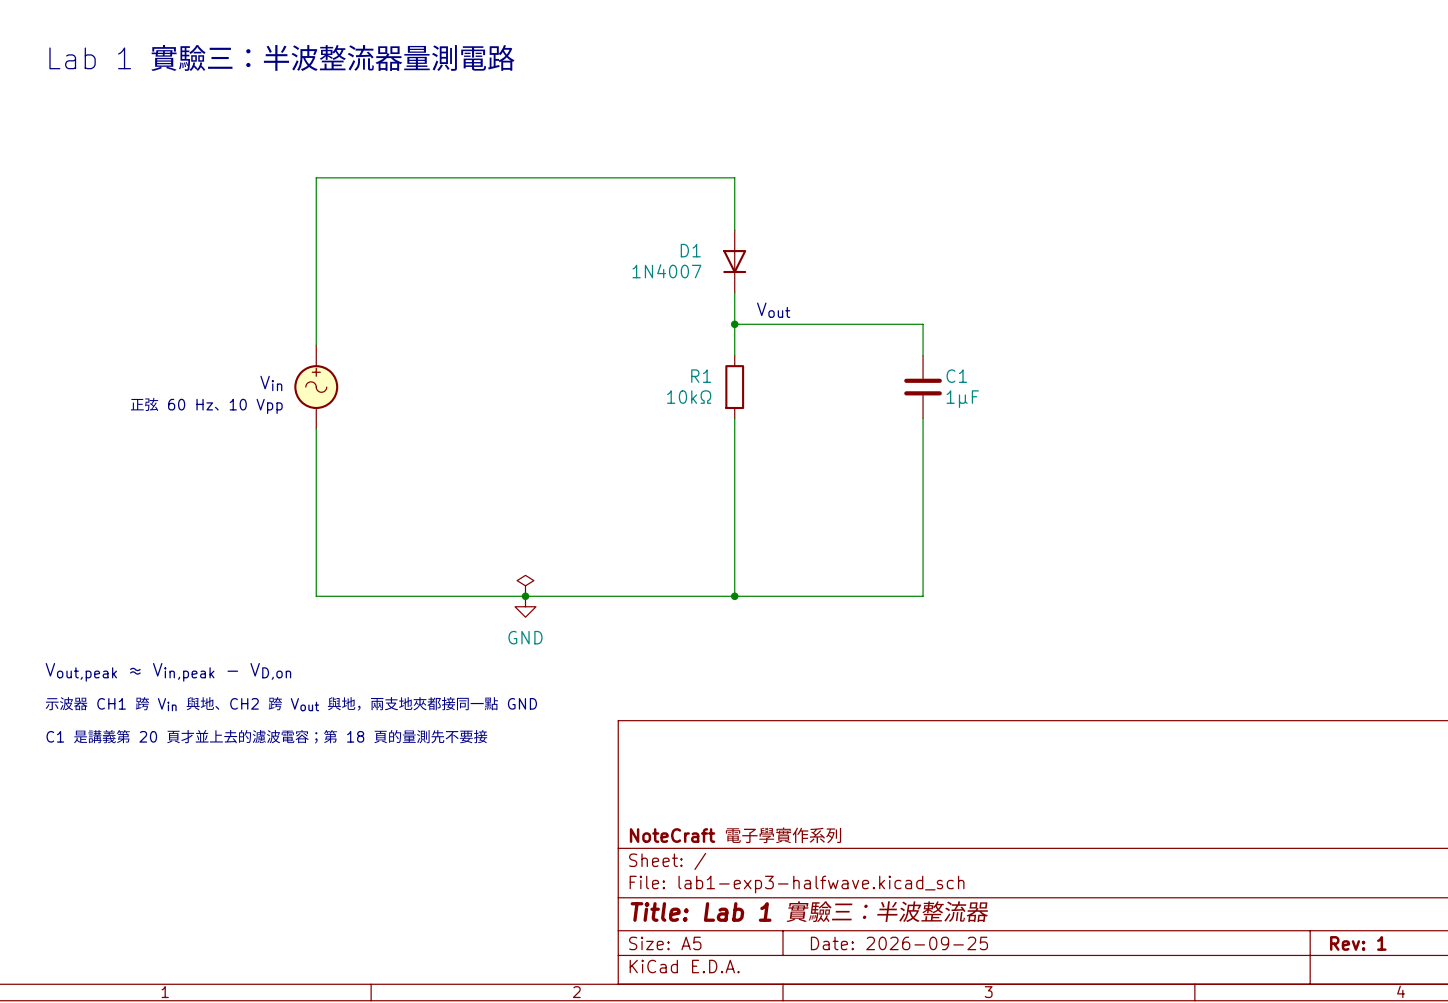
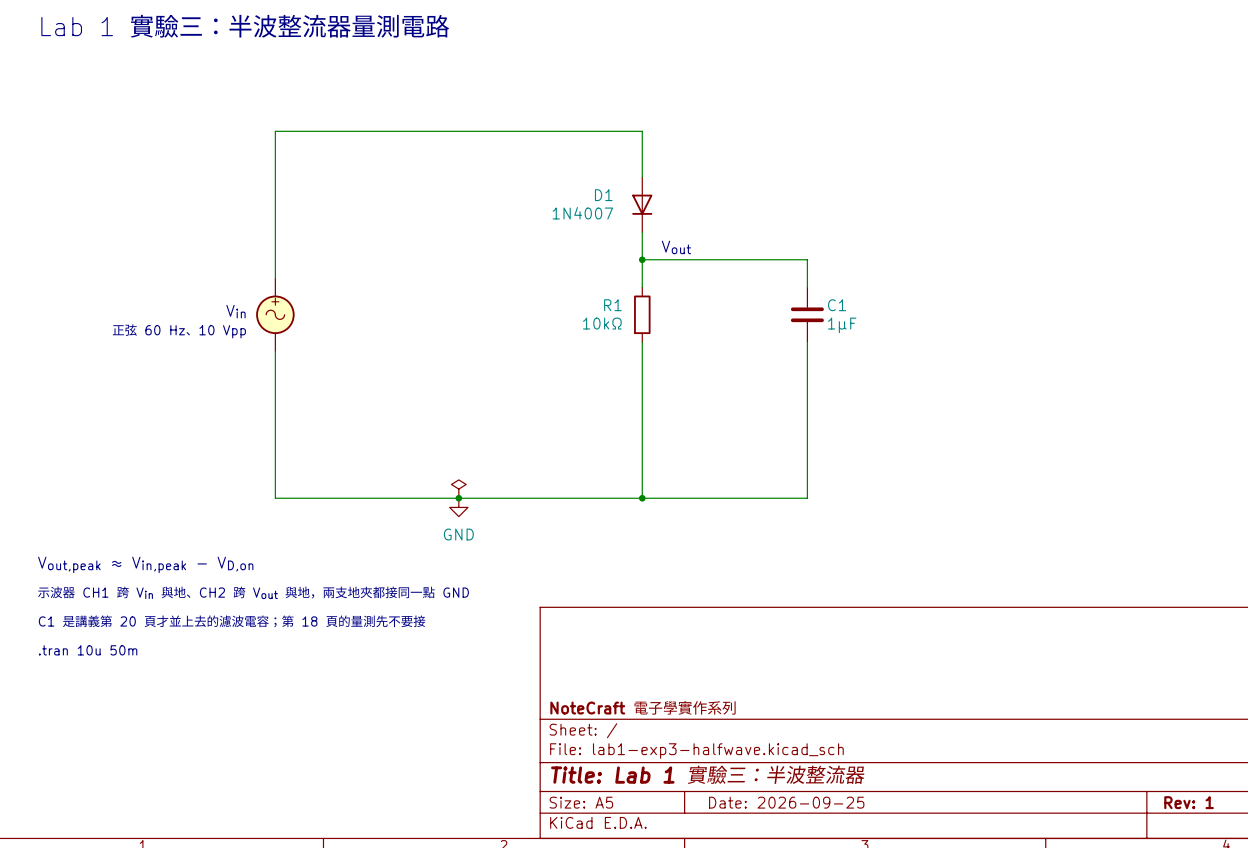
text: none -> .tran 10u 50m (88, 650)

